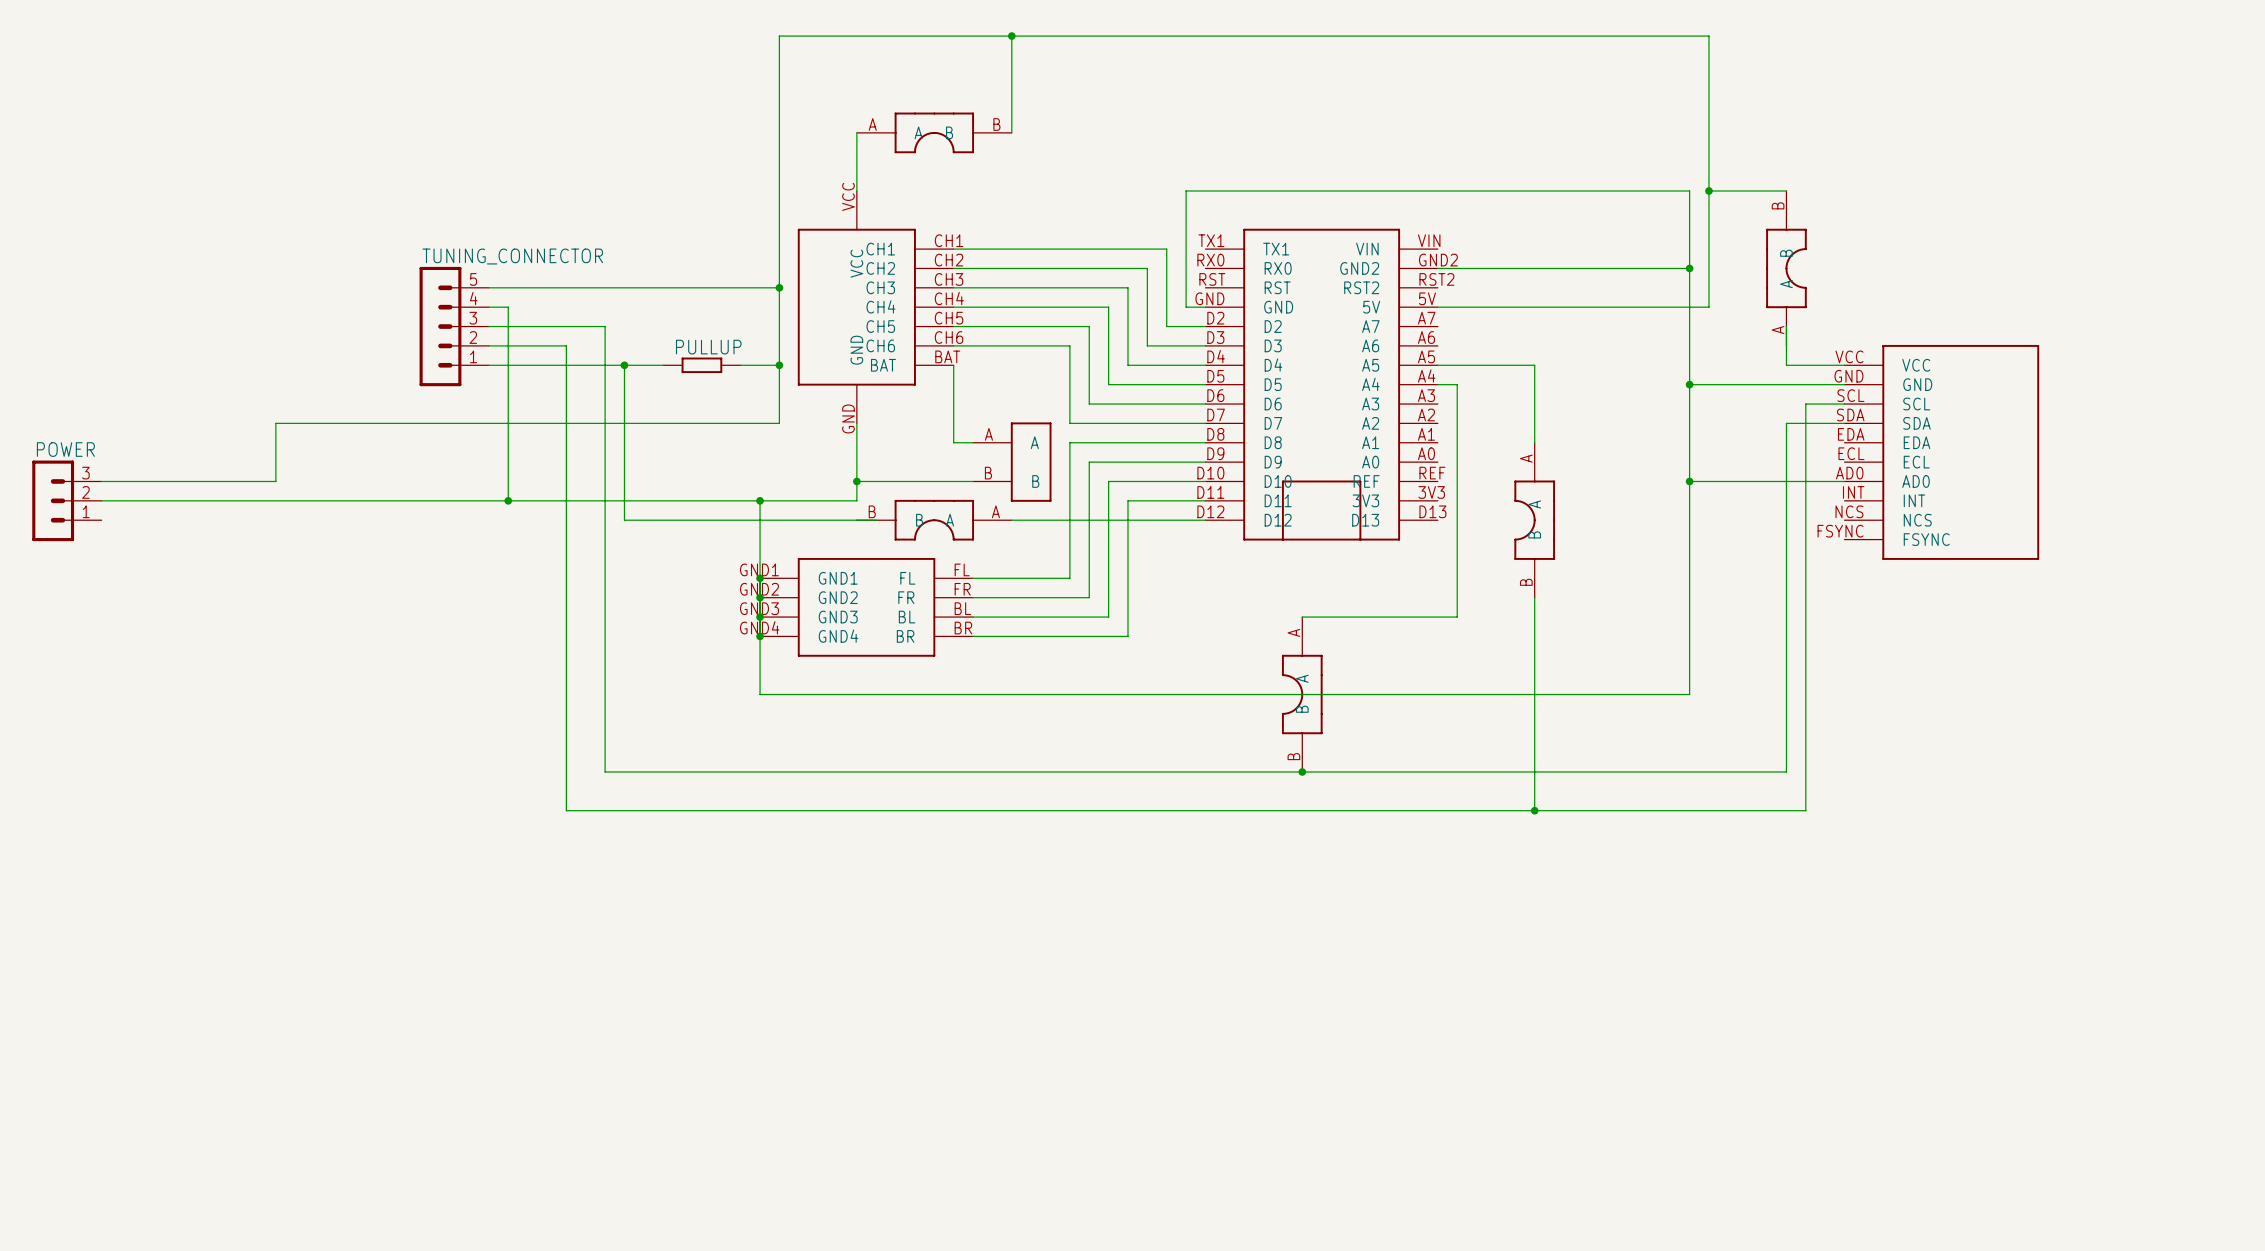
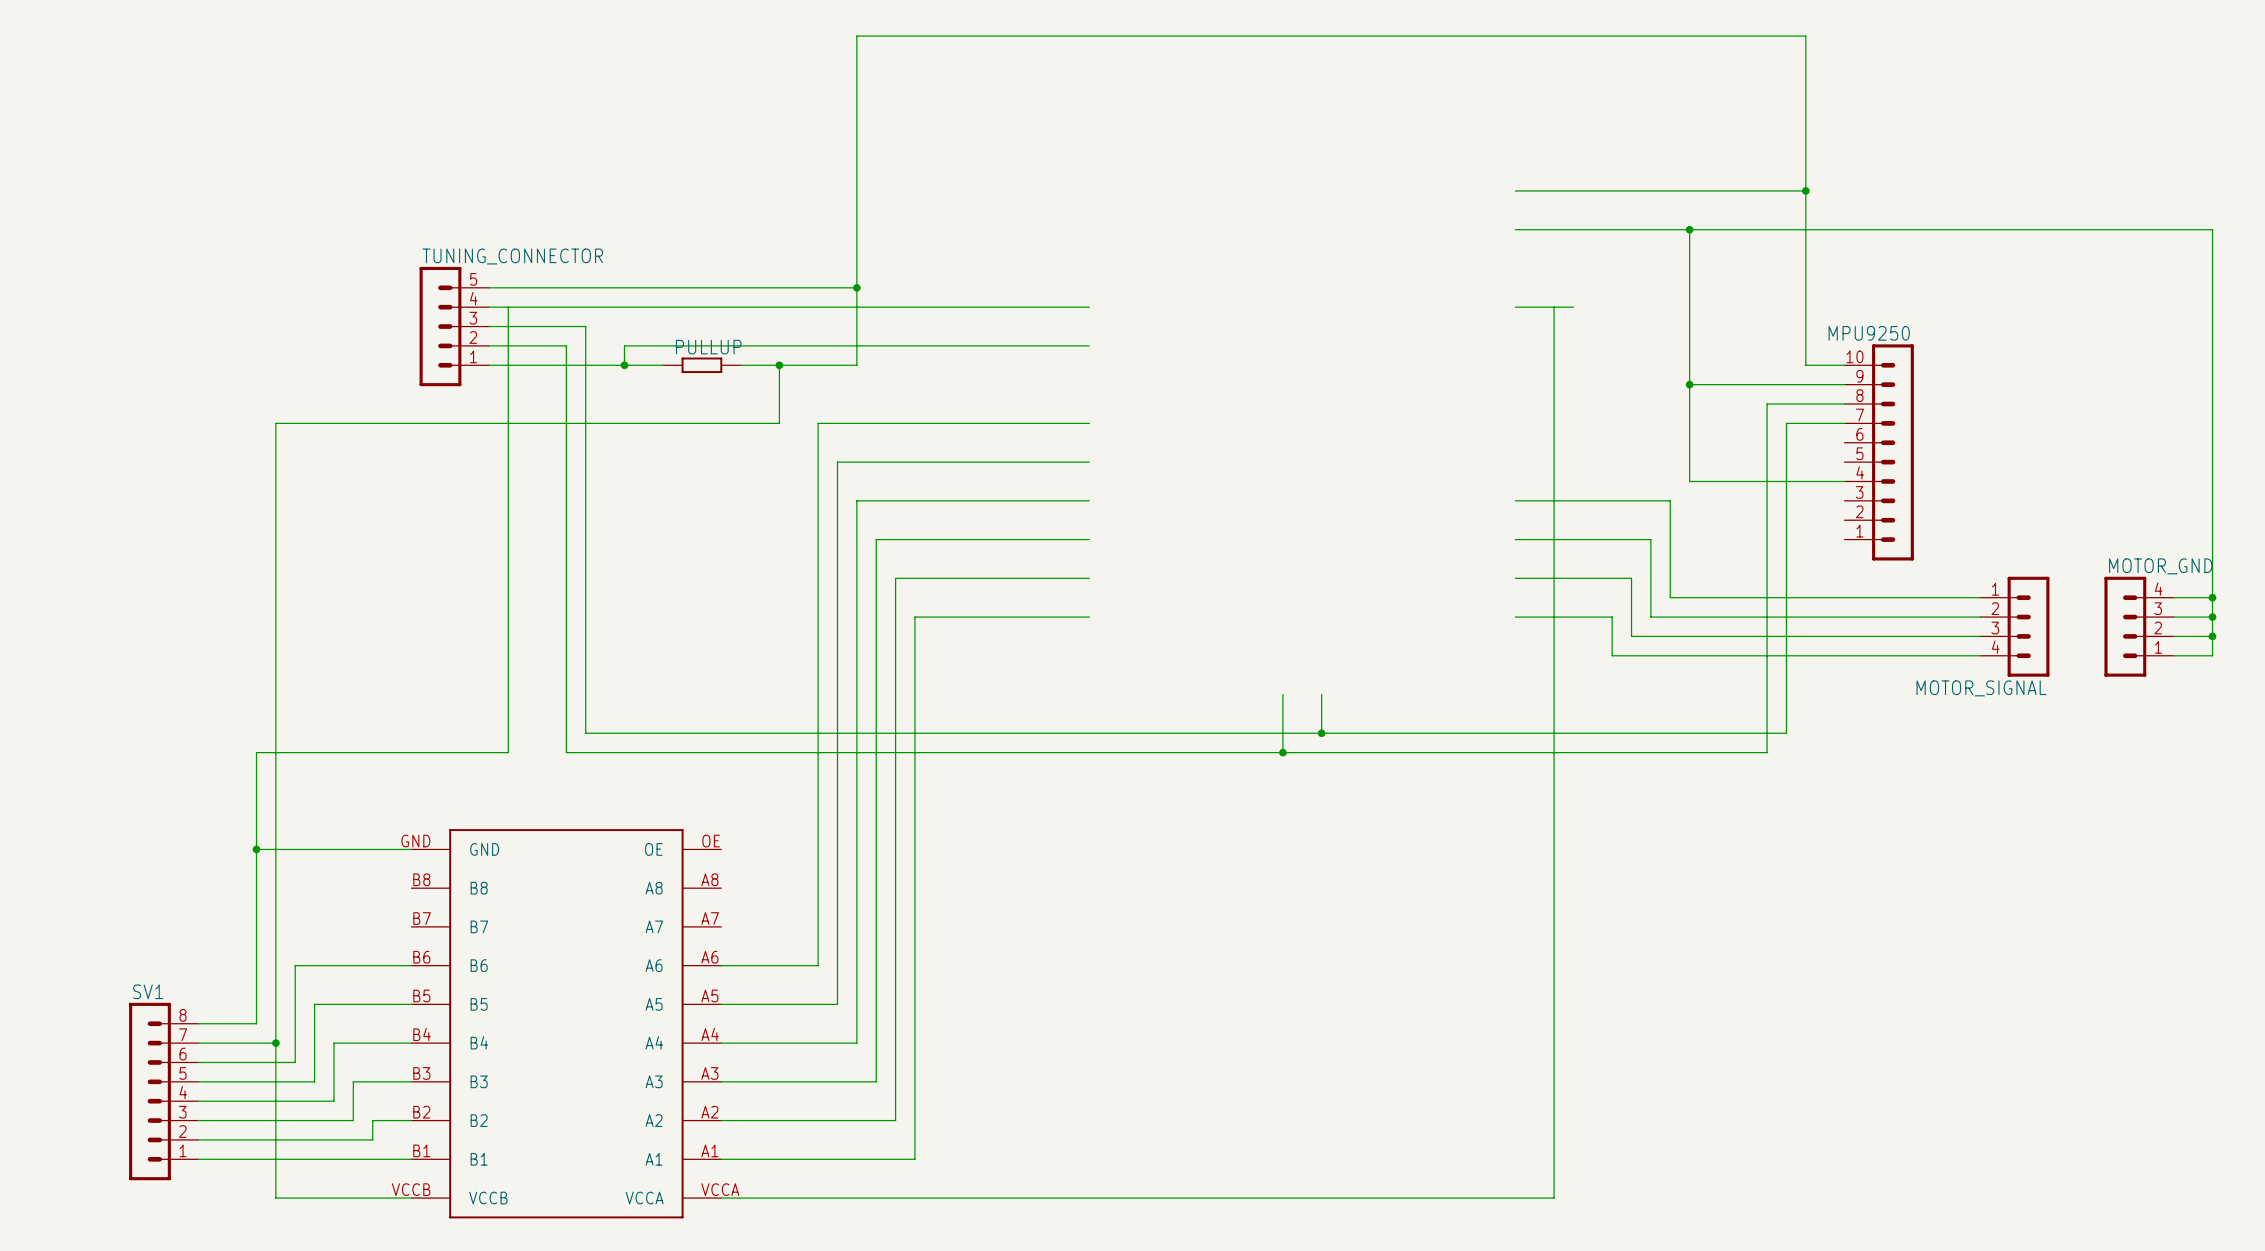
wire: (856, 36) (779, 36) (779, 365) -> (856, 190) (856, 365) (779, 365)
wire: (1011, 36) (1011, 132) -> (856, 36) (856, 132)
junction: (1011, 36) -> none
wire: (1708, 36) (1708, 307) (1573, 307) -> (1708, 36) (1805, 36) (1805, 365)
part: (934, 132) -> none
wire: (1515, 190) (1186, 190) (1186, 307) (1205, 307) -> none
wire: (1689, 190) (1689, 229) -> (1689, 190) (1708, 190)
junction: (1708, 190) -> none
wire: none -> (1786, 190) (1805, 190)
junction: none -> (1805, 190)
wire: none -> (1515, 229) (2212, 229) (2212, 655) (2173, 655)
junction: none -> (1689, 229)
wire: (953, 249) (1166, 249) (1166, 326) (1205, 326) -> none
wire: (953, 268) (1147, 268) (1147, 345) (1205, 345) -> none
wire: (1437, 268) (1689, 268) -> none
junction: (1689, 268) -> none
part: (1786, 268) -> none
wire: none -> (779, 287) (856, 287)
junction: (779, 287) -> none
junction: none -> (856, 287)
wire: (953, 287) (1127, 287) (1127, 365) (1205, 365) -> none
wire: none -> (508, 307) (953, 307)
part: (875, 307) -> none
wire: (1089, 307) (1108, 307) (1108, 384) (1205, 384) -> none
wire: (1437, 307) (1515, 307) -> none
wire: none -> (1554, 307) (1554, 1198) (721, 1198)
wire: (585, 326) (605, 326) (605, 771) (1786, 771) (1786, 733) -> (585, 326) (585, 733) (1786, 733)
wire: (953, 326) (1089, 326) (1089, 404) (1205, 404) -> none
wire: (1786, 326) (1786, 365) (1805, 365) -> none
wire: (1069, 345) (1069, 423) -> (1069, 345) (1089, 345)
wire: (624, 365) (624, 520) (876, 520) -> (624, 365) (624, 345) (953, 345)
wire: (953, 365) (953, 442) (973, 442) -> none
wire: (1437, 365) (1534, 365) (1534, 442) -> none
part: (1321, 384) -> none
wire: (1437, 384) (1457, 384) (1457, 617) (1302, 617) -> none
wire: (1805, 404) (1805, 810) (566, 810) (566, 752) -> (1805, 404) (1767, 404) (1767, 752) (566, 752)
wire: (856, 423) (856, 500) (101, 500) -> none
wire: none -> (1069, 423) (818, 423) (818, 965) (721, 965)
wire: (1089, 423) (1205, 423) -> none
wire: (1205, 442) (1069, 442) (1069, 578) -> (1089, 578) (1069, 578)
MPU9250: none -> (1879, 452)
part: (1941, 452) -> none
part: (1012, 462) -> none
wire: none -> (1089, 462) (837, 462) (837, 1004) (721, 1004)
wire: (1205, 462) (1089, 462) (1089, 597) (973, 597) -> none
wire: (101, 481) (275, 481) -> (411, 1198) (275, 1198) (275, 481)
wire: (856, 481) (973, 481) -> none
junction: (856, 481) -> none
wire: (1205, 481) (1108, 481) (1108, 617) (1089, 617) -> none
wire: (1689, 481) (1689, 694) (760, 694) (760, 500) -> none
junction: (1689, 481) -> none
POWER: (66, 500) -> none
wire: none -> (508, 500) (508, 752) (256, 752) (256, 1023) (198, 1023)
junction: (508, 500) -> none
junction: (760, 500) -> none
wire: none -> (1089, 500) (856, 500) (856, 1043) (721, 1043)
wire: (1205, 500) (1127, 500) (1127, 636) (973, 636) -> none
wire: none -> (1515, 500) (1670, 500) (1670, 597) (1980, 597)
part: (934, 520) -> none
wire: (1011, 520) (1205, 520) -> none
part: (1534, 520) -> none
wire: none -> (1089, 539) (876, 539) (876, 1081) (721, 1081)
wire: none -> (1515, 539) (1650, 539) (1650, 617) (1980, 617)
junction: (760, 578) -> none
wire: none -> (973, 578) (895, 578) (895, 1120) (721, 1120)
wire: none -> (1515, 578) (1631, 578) (1631, 636) (1980, 636)
junction: (760, 597) -> none
wire: (1534, 597) (1534, 810) -> none
wire: none -> (2173, 597) (2212, 597)
junction: none -> (2212, 597)
part: (866, 607) -> none
junction: (760, 617) -> none
wire: none -> (973, 617) (914, 617) (914, 1159) (721, 1159)
wire: none -> (1515, 617) (1612, 617) (1612, 655) (1980, 655)
wire: none -> (2173, 617) (2212, 617)
junction: none -> (2212, 617)
MOTOR_SIGNAL: none -> (2014, 626)
MOTOR_GND: none -> (2139, 626)
junction: (760, 636) -> none
wire: none -> (2173, 636) (2212, 636)
junction: none -> (2212, 636)
wire: none -> (1282, 694) (1282, 752)
part: (1302, 694) -> none
junction: none -> (1321, 733)
junction: none -> (1282, 752)
junction: (1302, 771) -> none
junction: (1534, 810) -> none
wire: none -> (256, 849) (411, 849)
junction: none -> (256, 849)
wire: none -> (411, 965) (295, 965) (295, 1062) (198, 1062)
wire: none -> (411, 1004) (314, 1004) (314, 1081) (198, 1081)
part: none -> (566, 1023)
wire: none -> (198, 1043) (275, 1043)
junction: none -> (275, 1043)
wire: none -> (411, 1043) (333, 1043) (333, 1101) (198, 1101)
wire: none -> (411, 1081) (353, 1081) (353, 1120) (198, 1120)
SV1: none -> (163, 1091)
wire: none -> (411, 1120) (372, 1120) (372, 1139) (198, 1139)
wire: none -> (198, 1159) (411, 1159)

